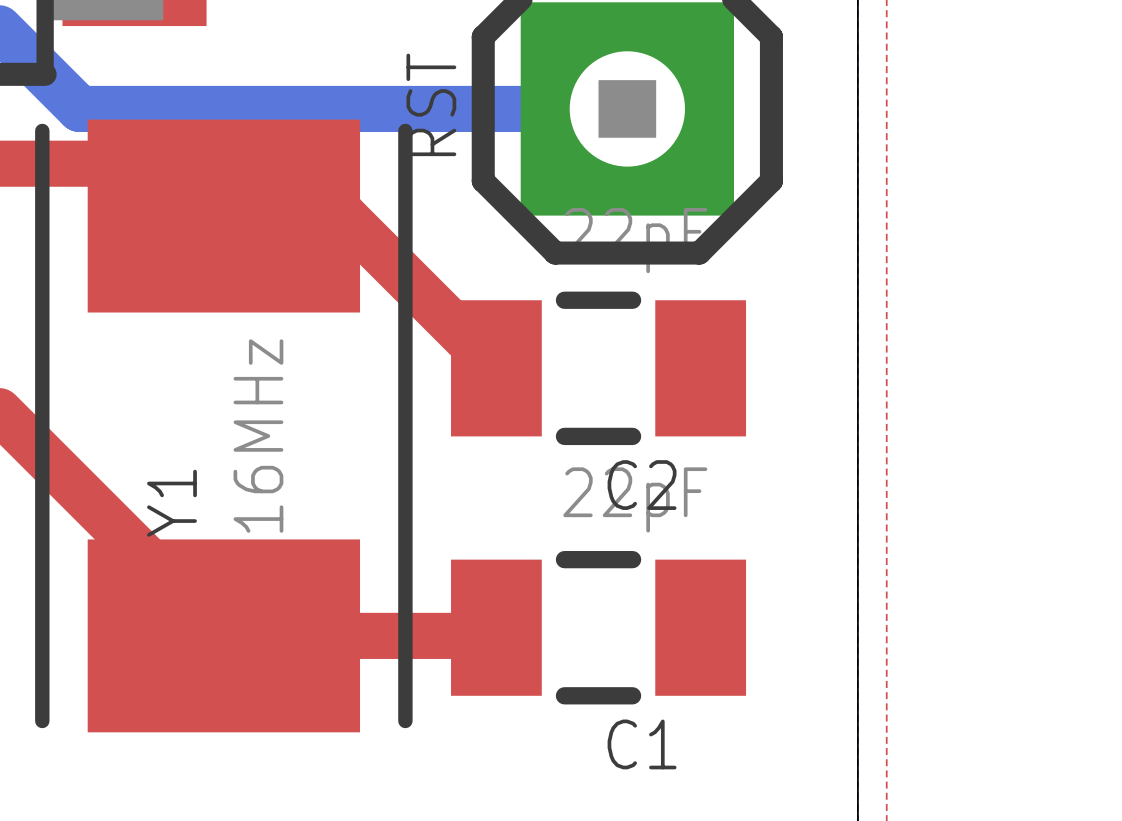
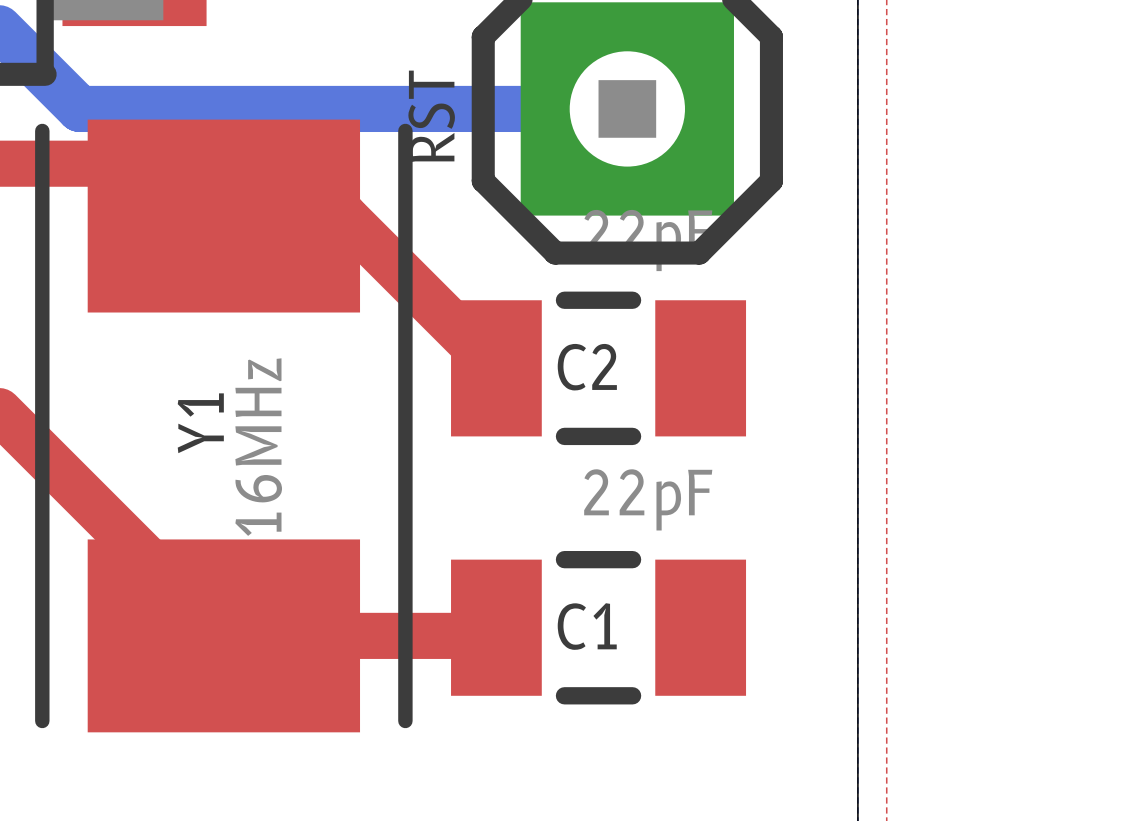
C2 name position: C2 (642, 485) -> C2 (587, 367)
Y1 name position: Y1 (171, 503) -> Y1 (200, 423)
C1 name position: C1 (642, 744) -> C1 (587, 626)

